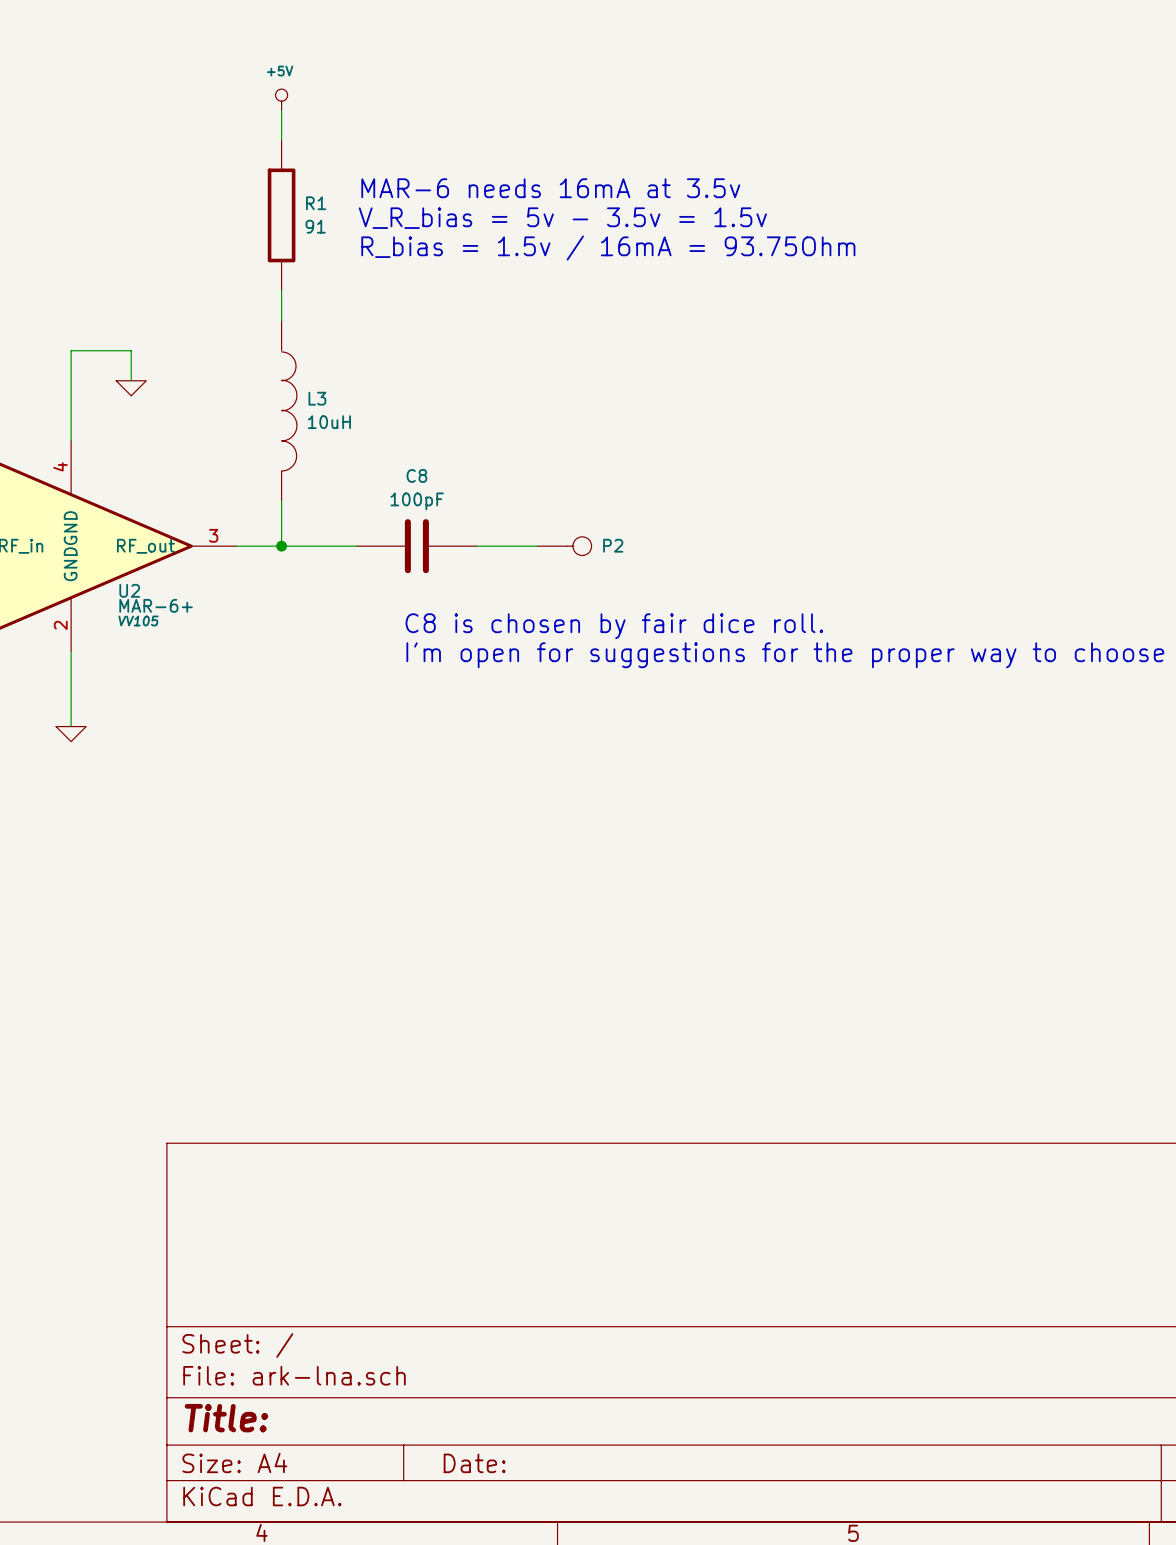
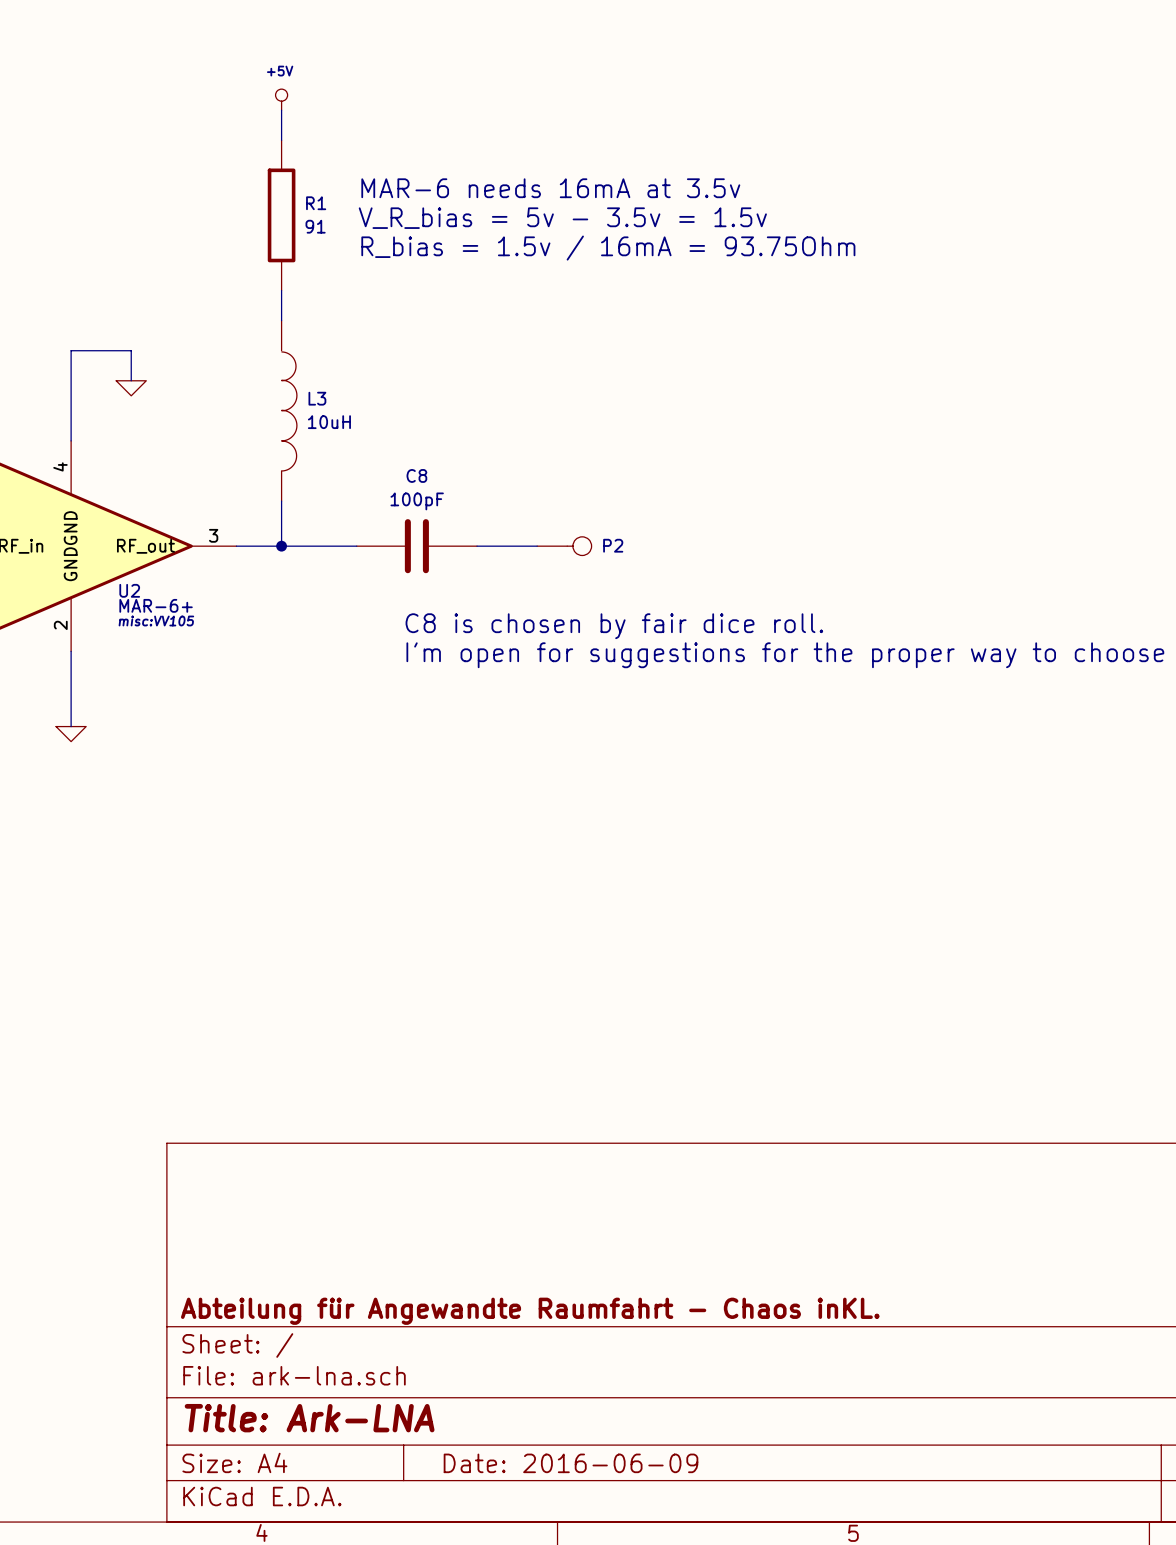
U2 text: VV105 (138, 621) -> misc:VV105 (156, 621)
title block: none -> Abteilung für Angewandte Raumfahrt - Chaos inKL. (530, 1311)
title block: Title: (226, 1418) -> Title: Ark-LNA (309, 1418)
title block: Date: (474, 1463) -> Date: 2016-06-09 (570, 1463)

